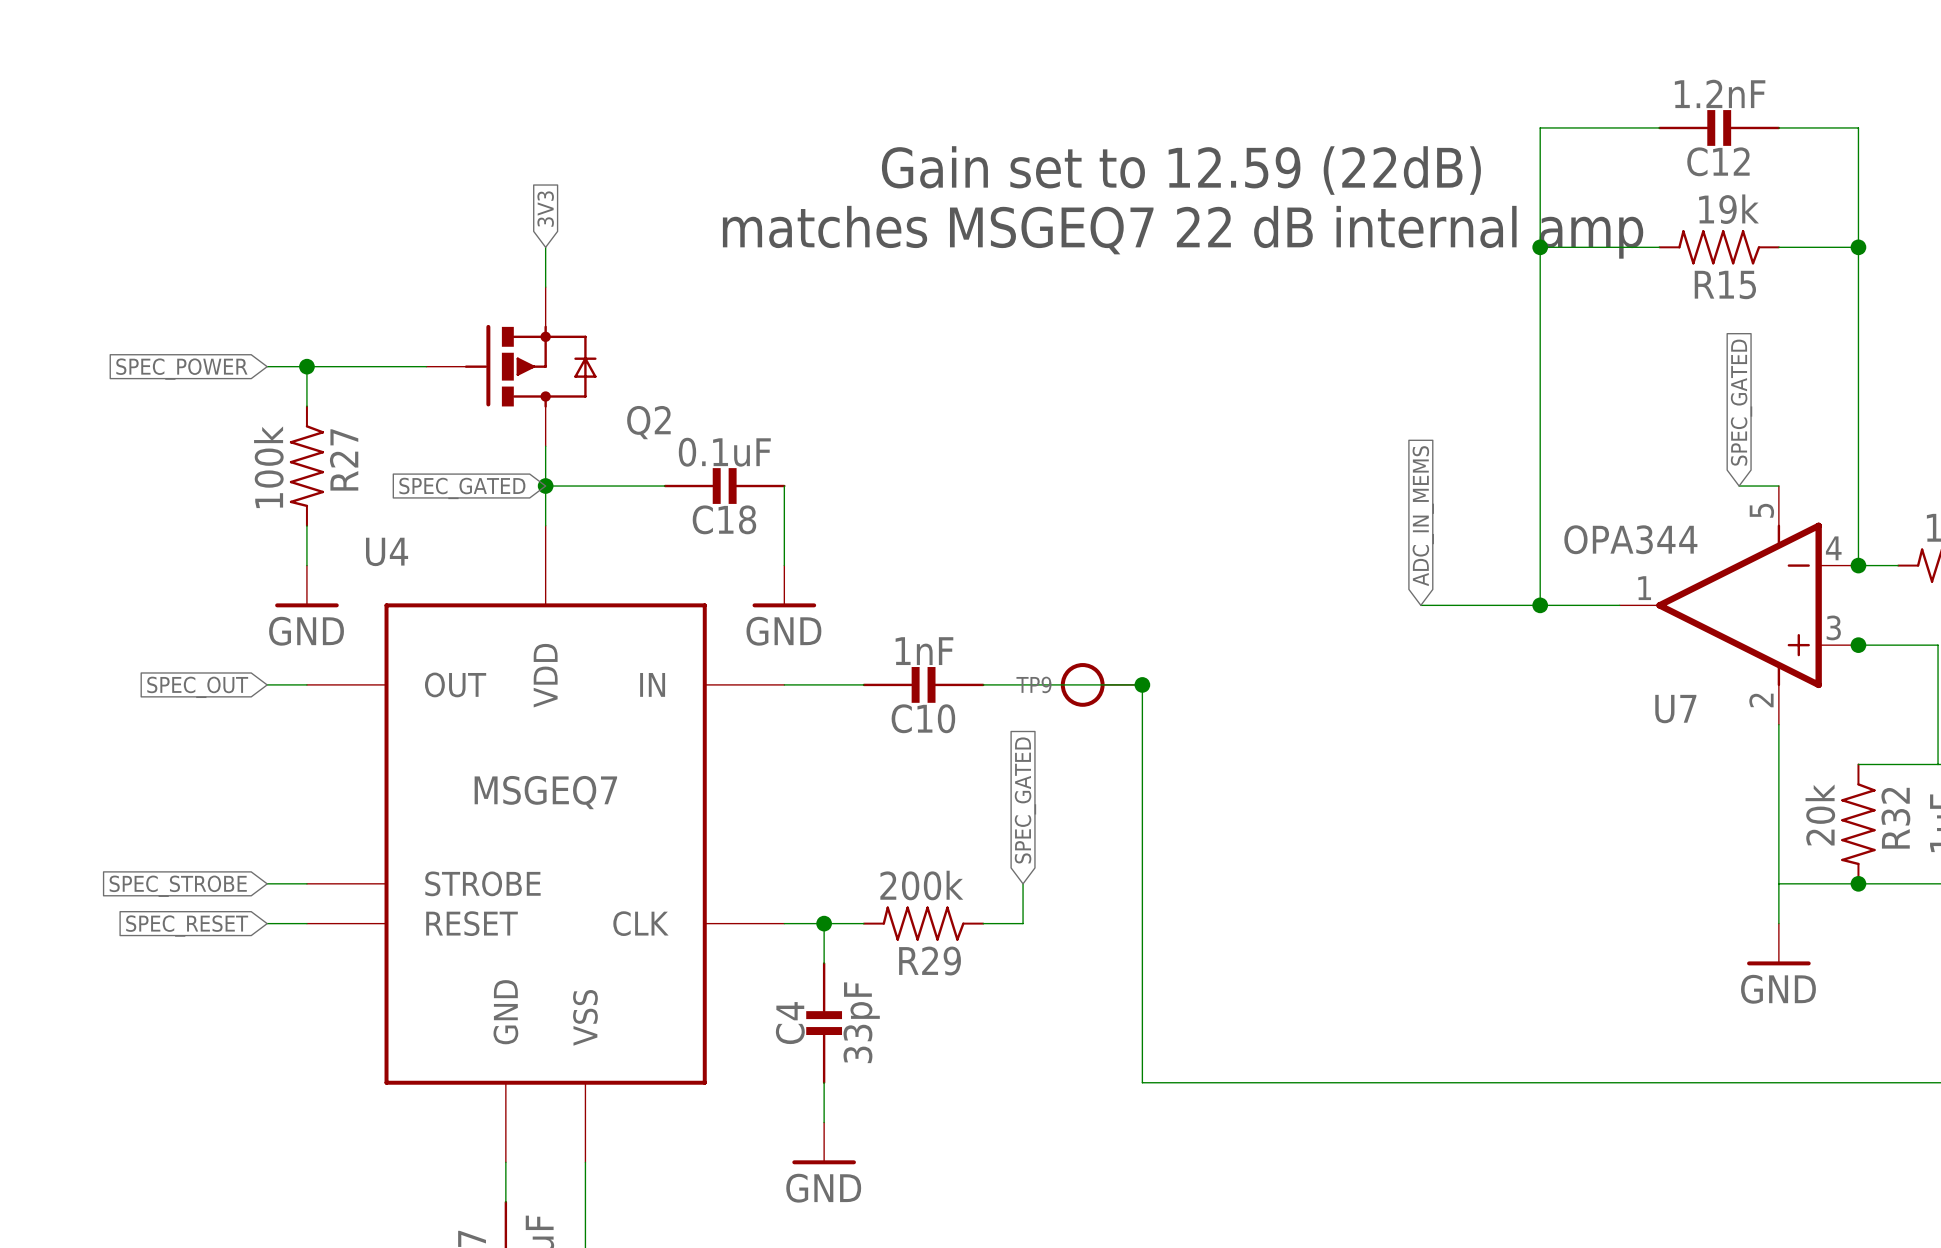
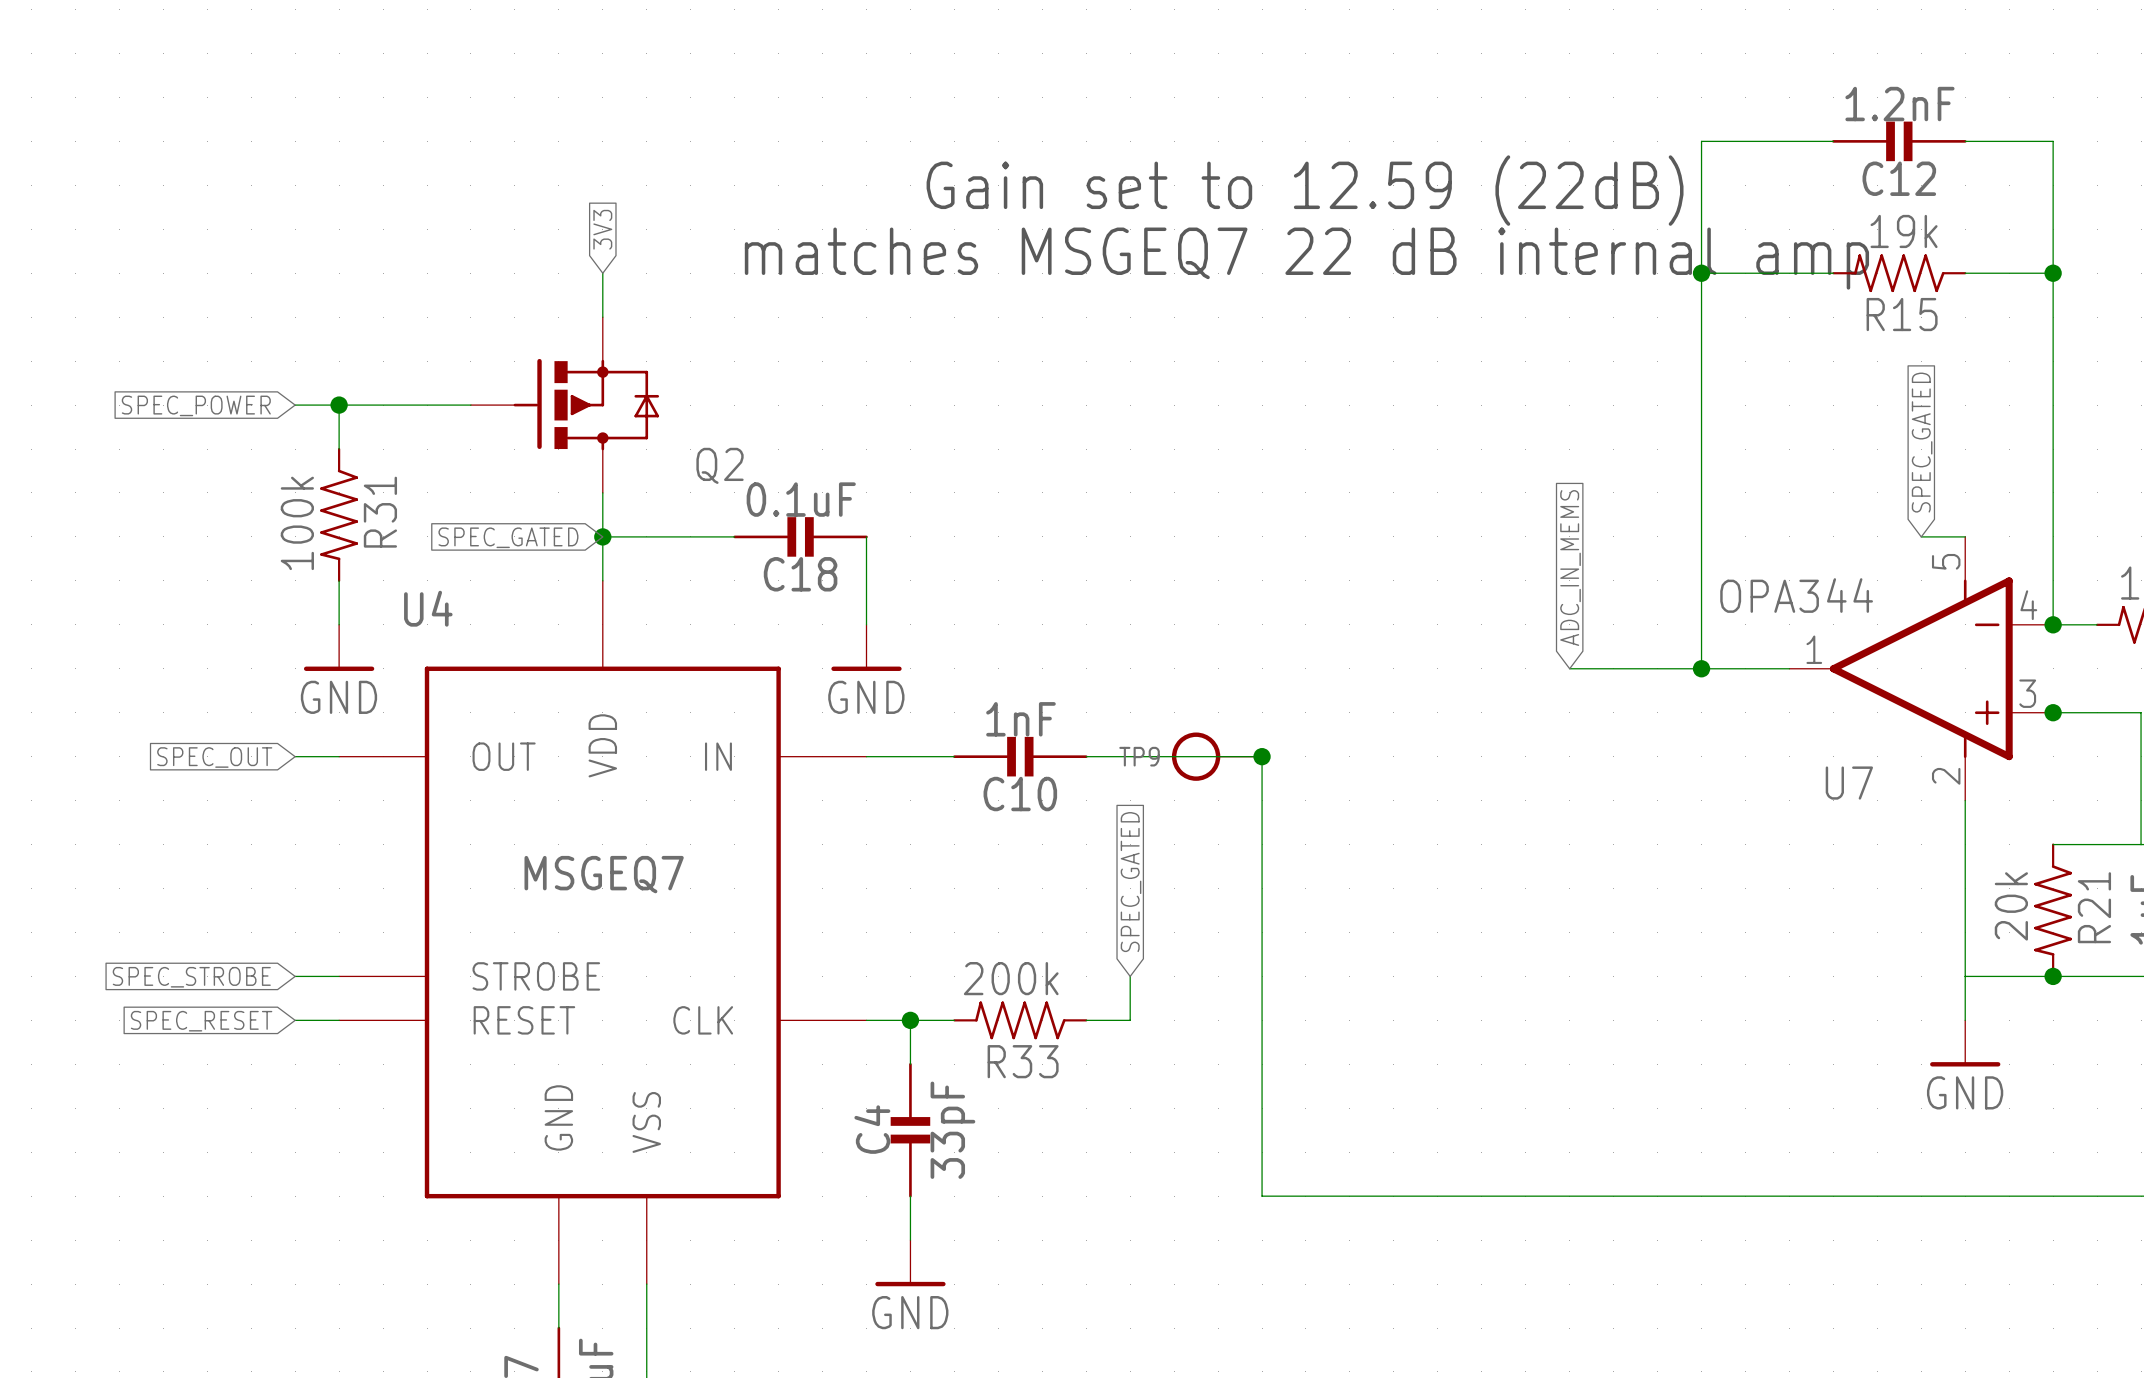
R27 name: R27 (344, 459) -> R31 (380, 512)
R32 name: R32 (1895, 818) -> R21 (2094, 907)
R29 name: R29 (930, 961) -> R33 (1023, 1061)

